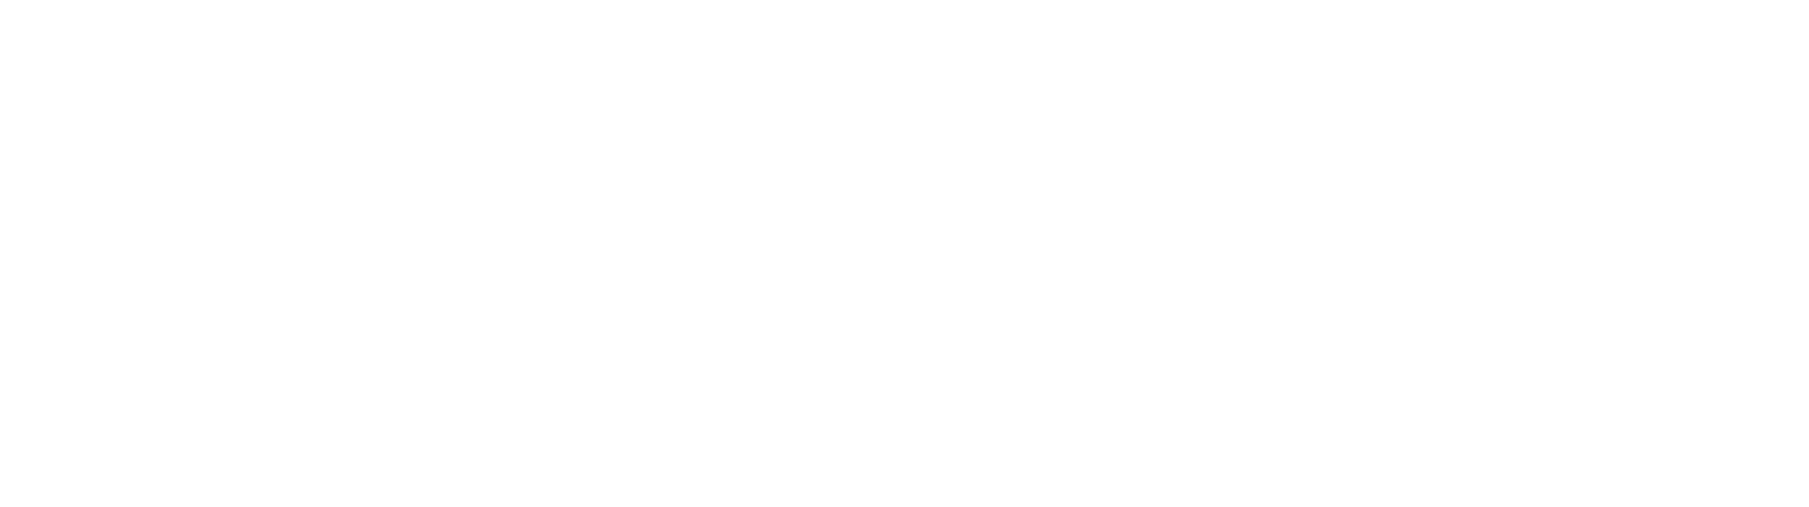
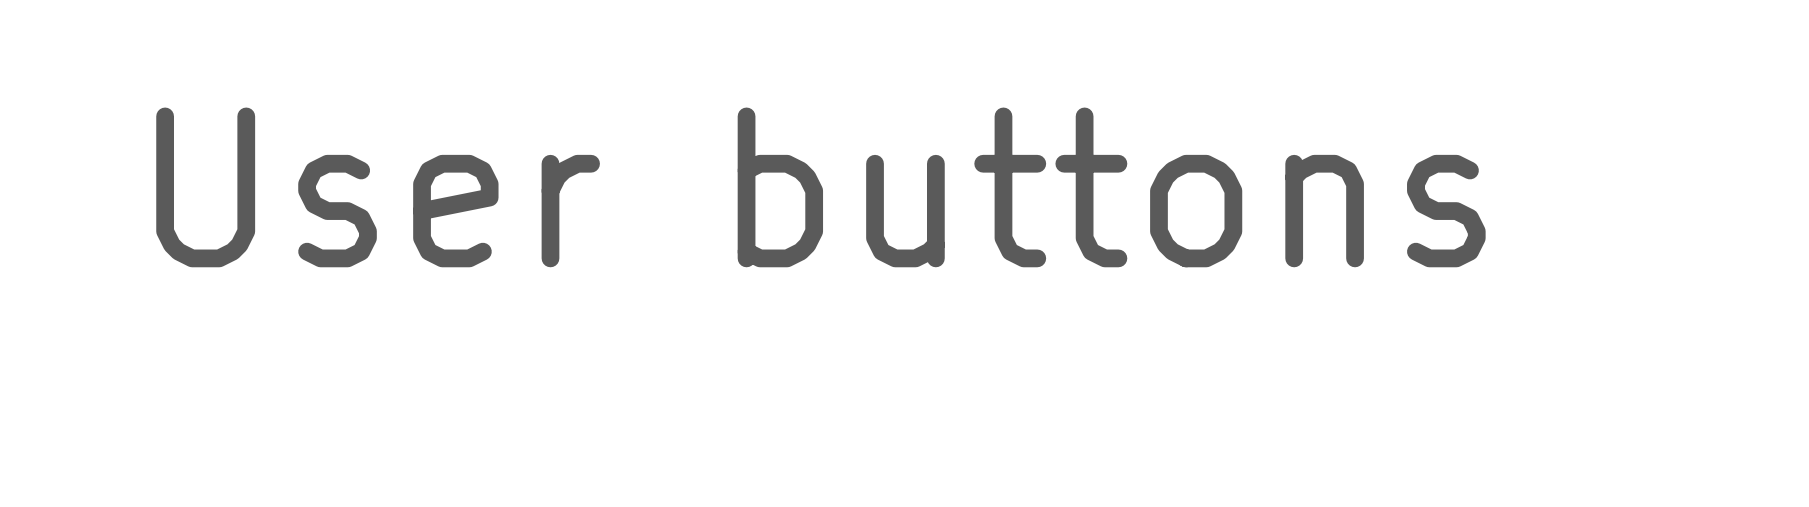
text: none -> User buttons (820, 187)

